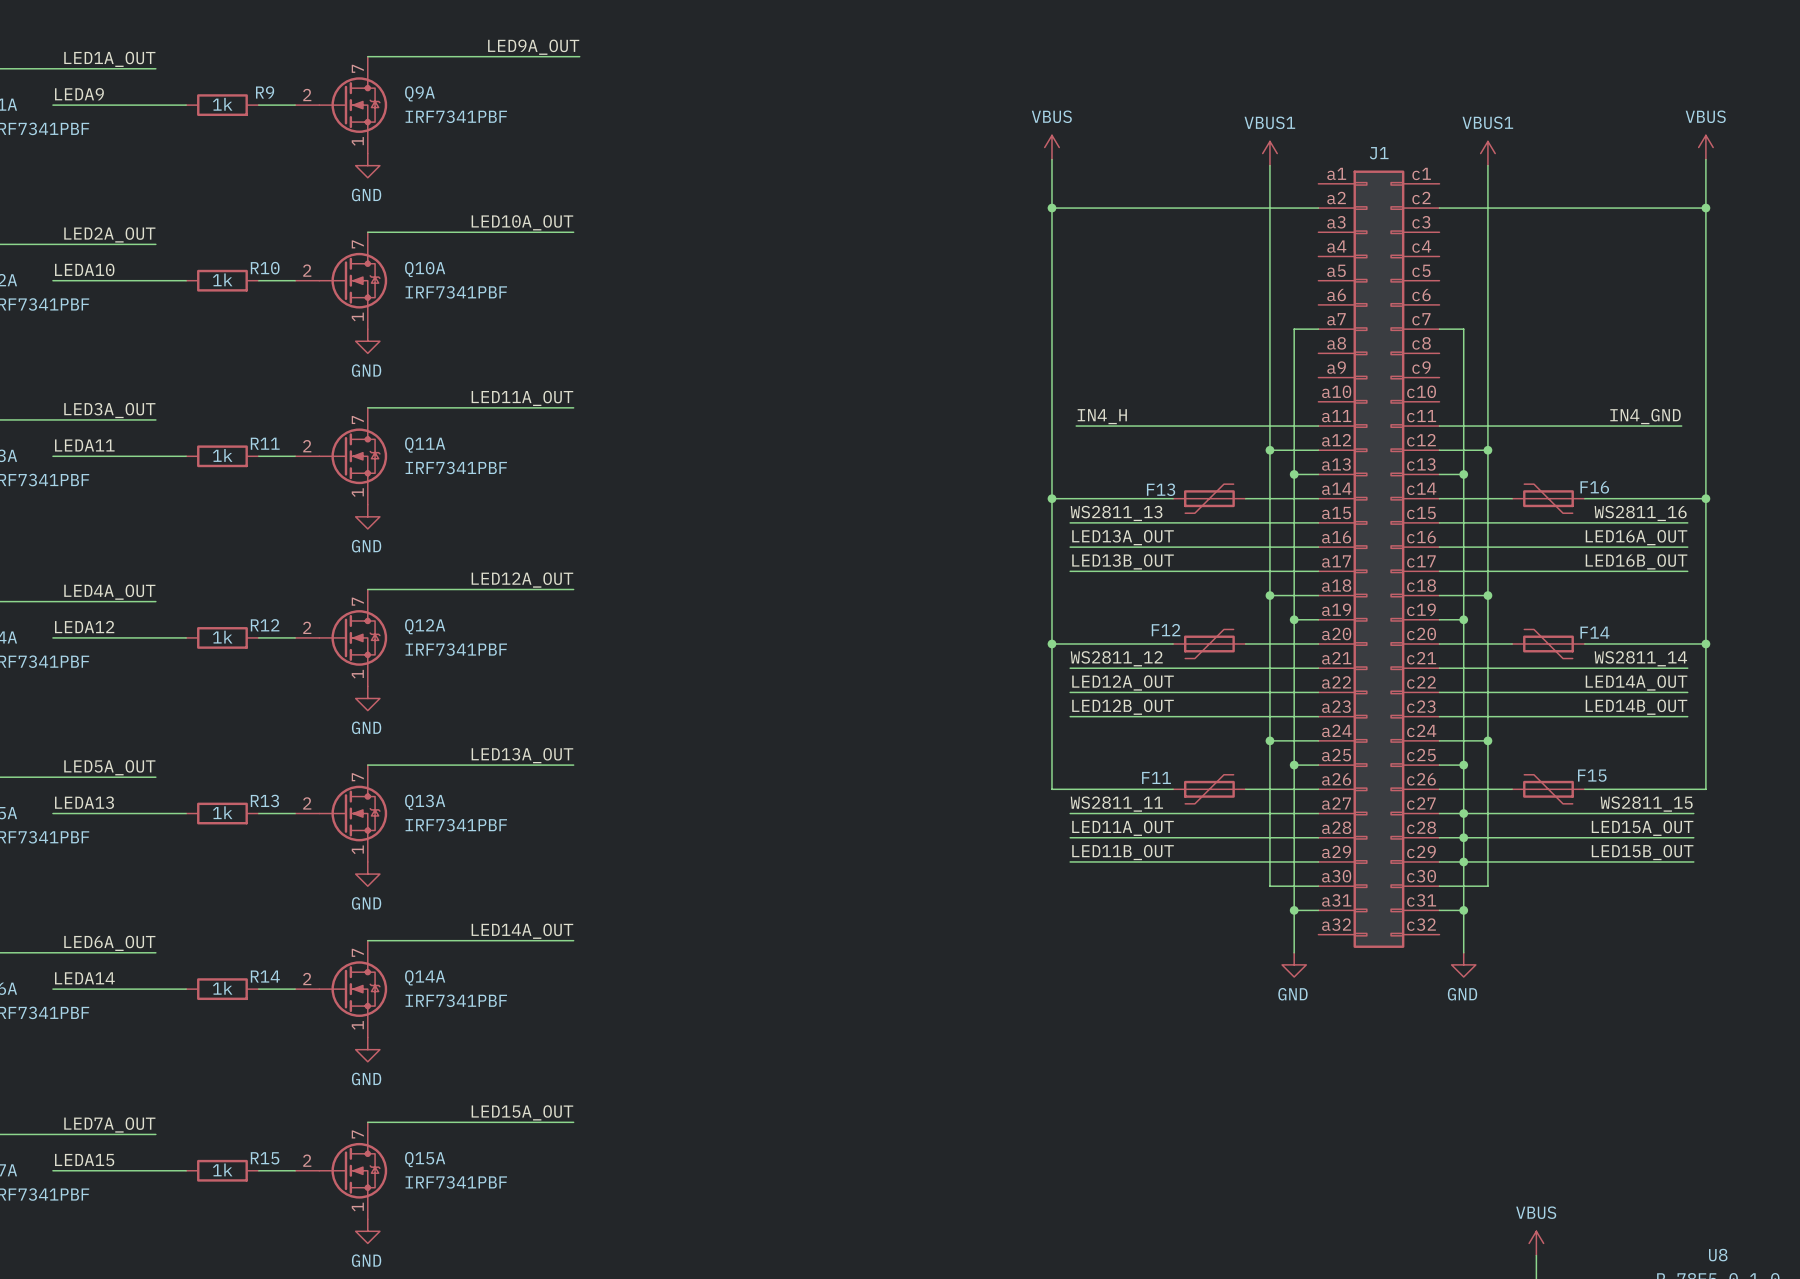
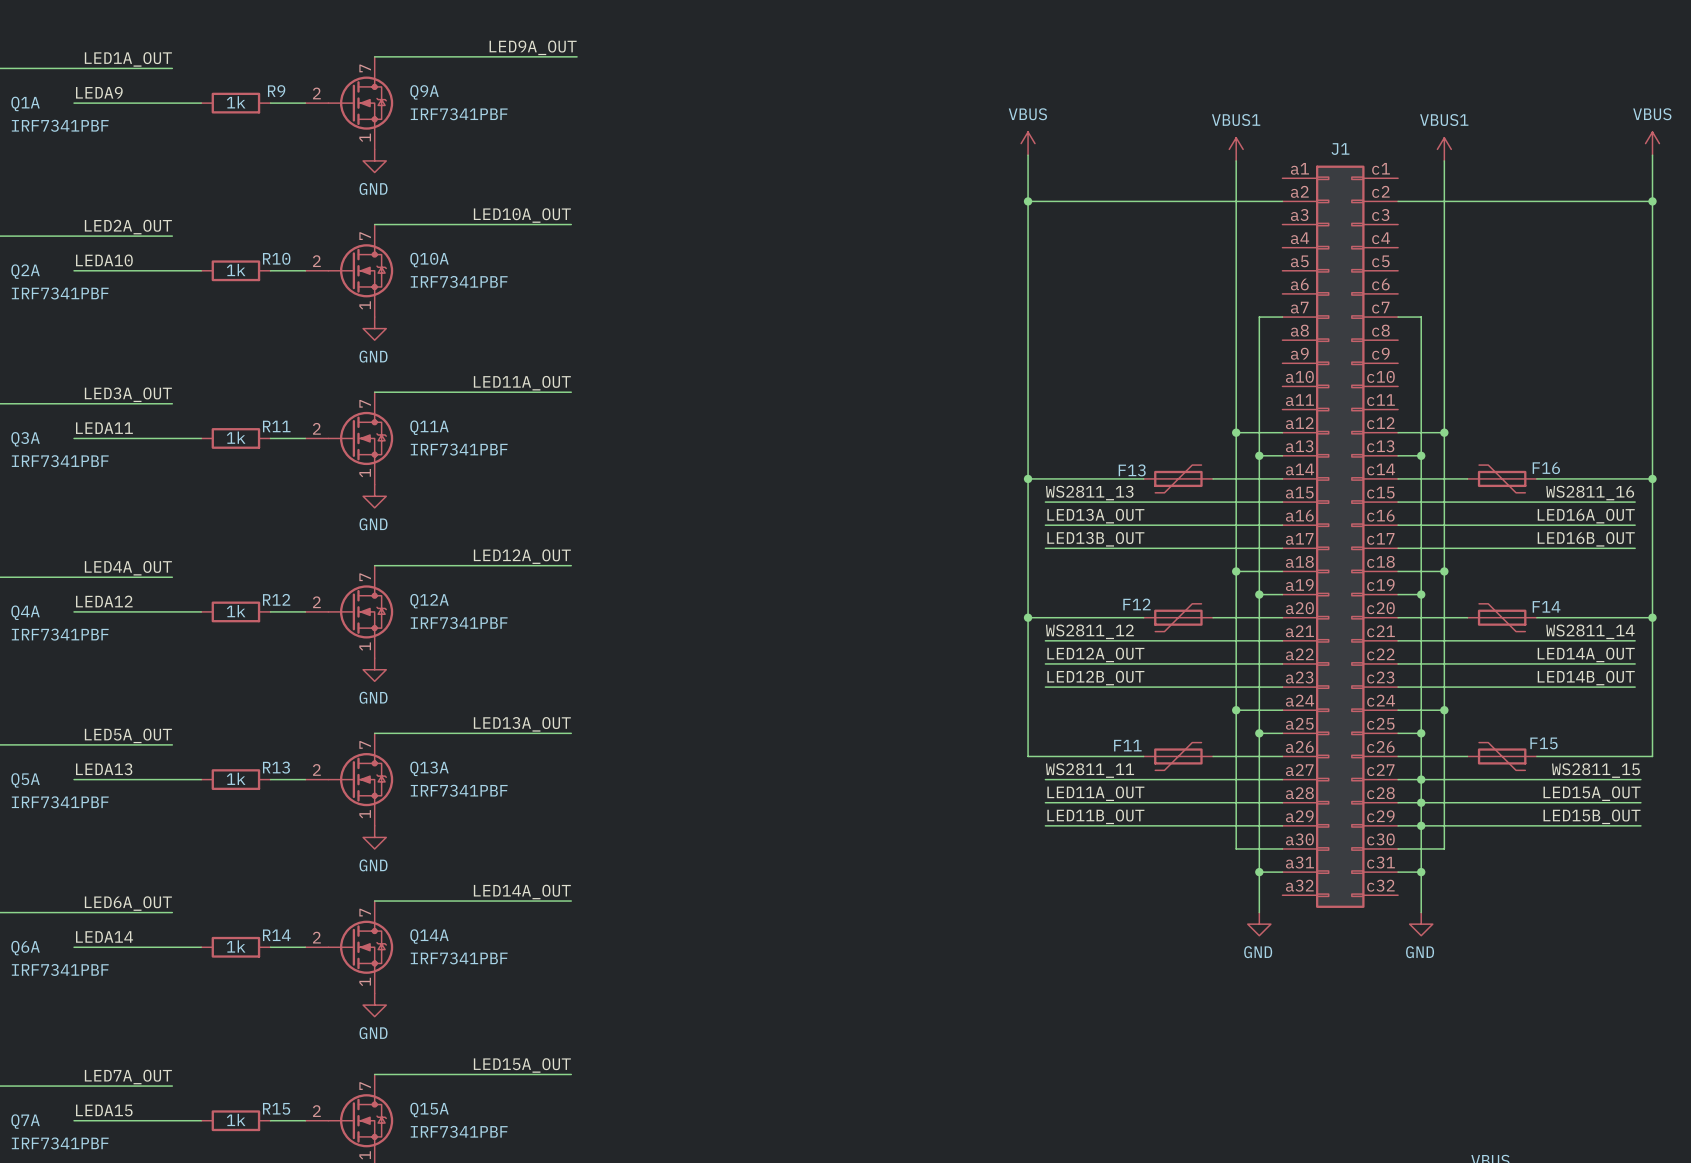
label: IN4_H (1102, 416) -> none
label: IN4_GND (1645, 416) -> none
wire: (1076, 426) (1318, 426) -> none
wire: (1439, 426) (1681, 426) -> none

